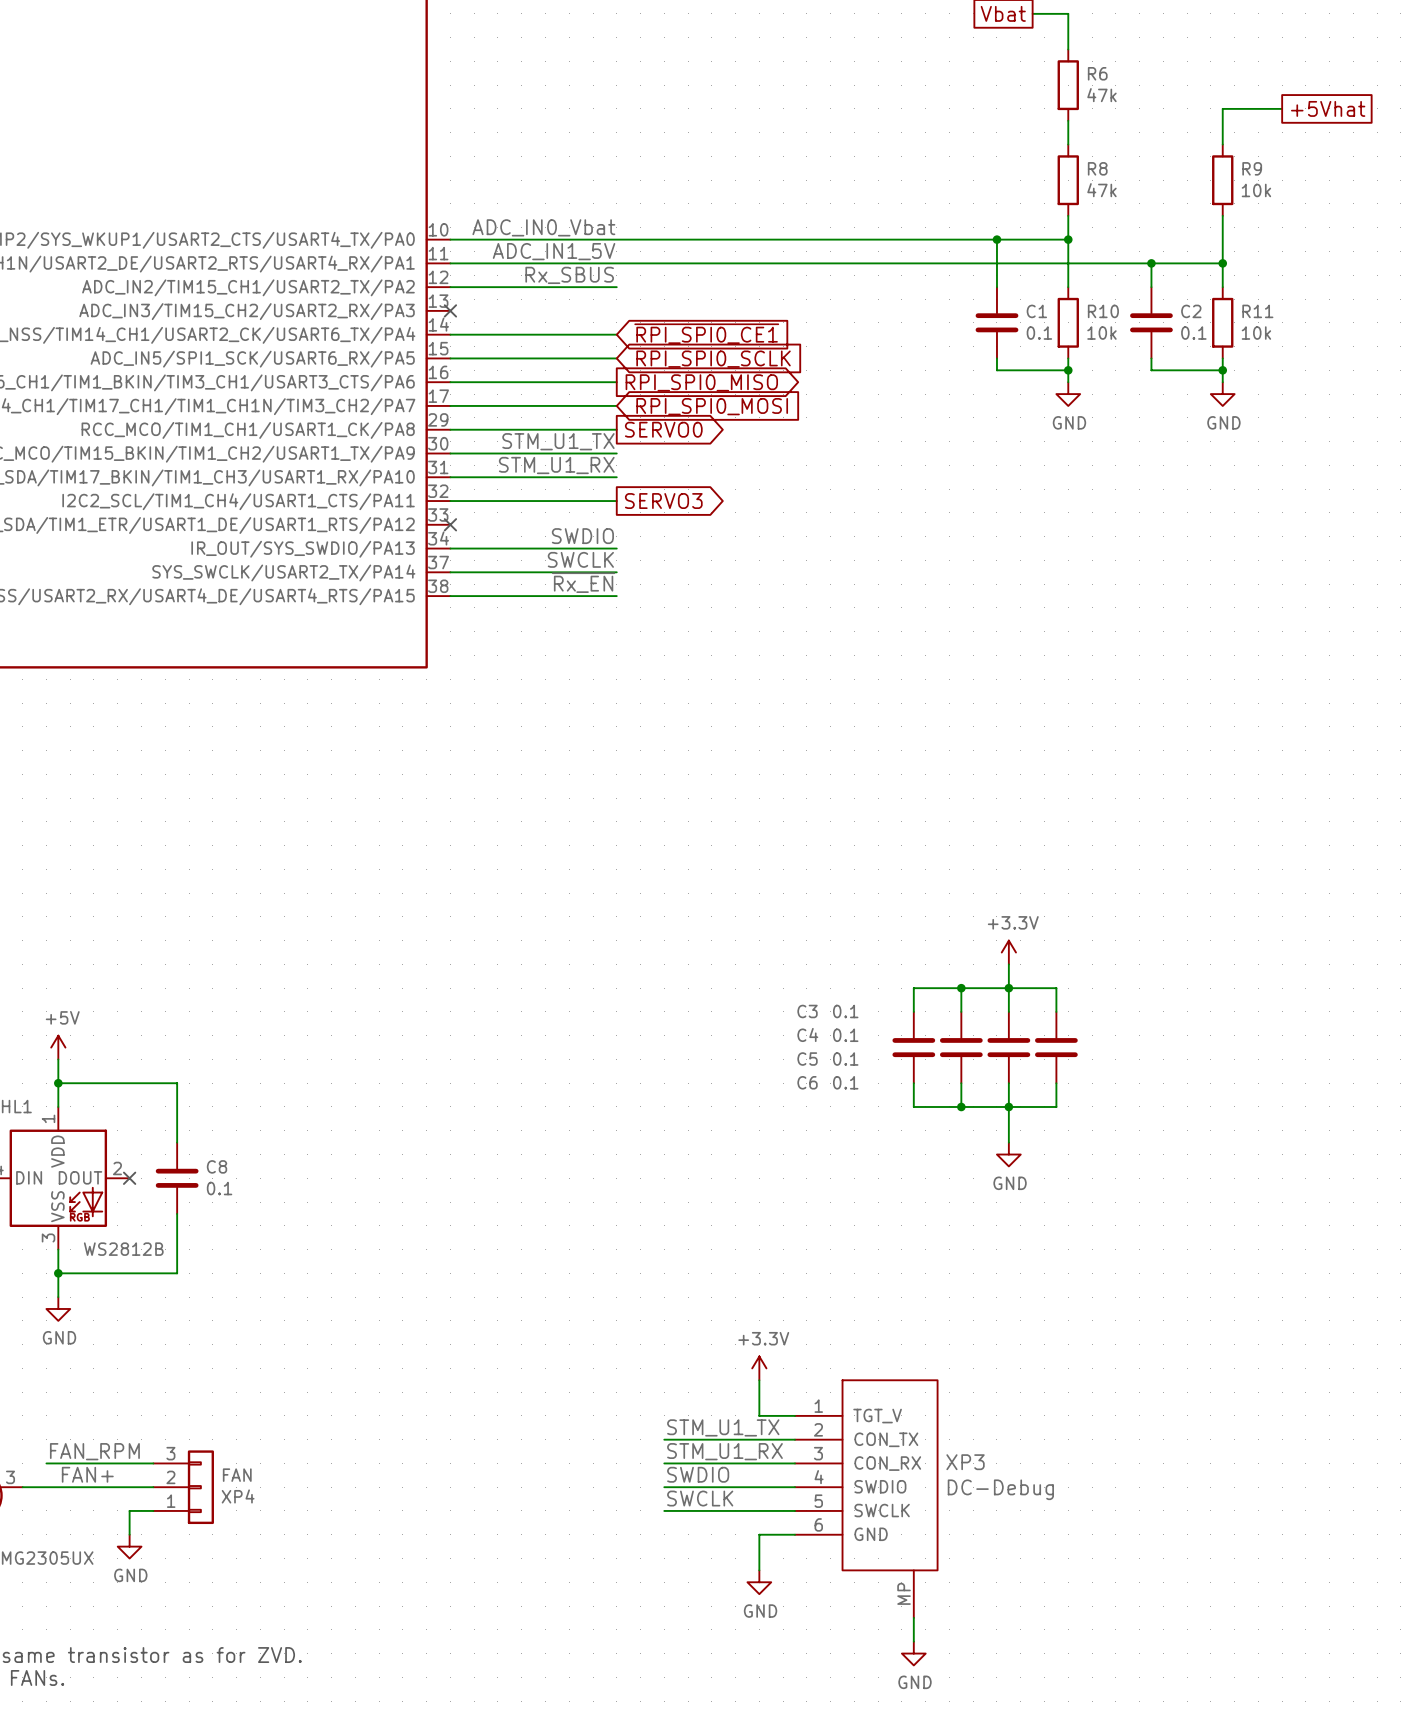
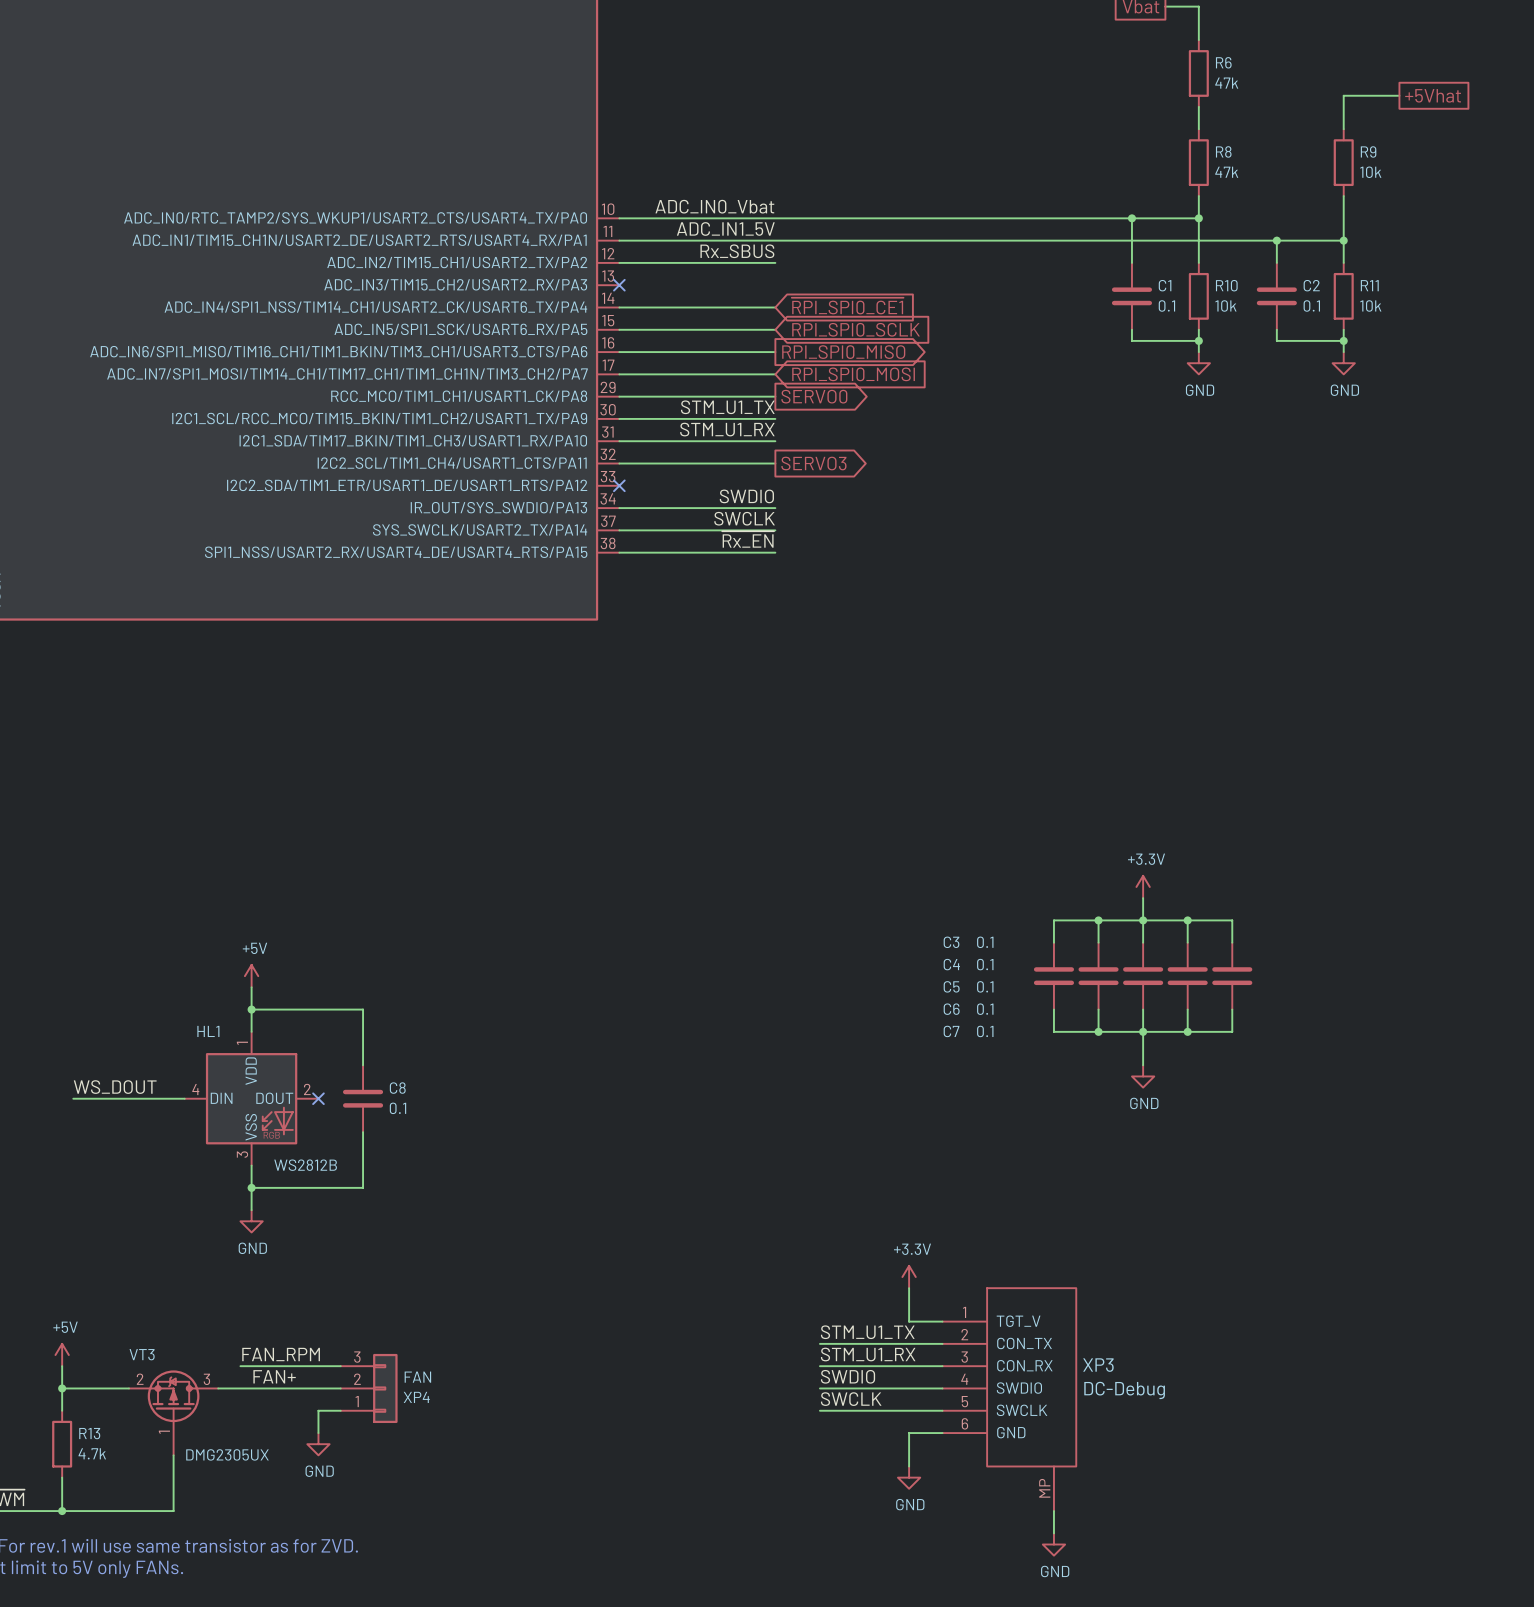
wire: none -> (1187, 920) (1232, 920) (1232, 942)
junction: none -> (1187, 920)
C7: none -> 0.1 (1232, 976)
wire: none -> (1232, 1009) (1232, 1031) (1187, 1031)
junction: none -> (1187, 1031)

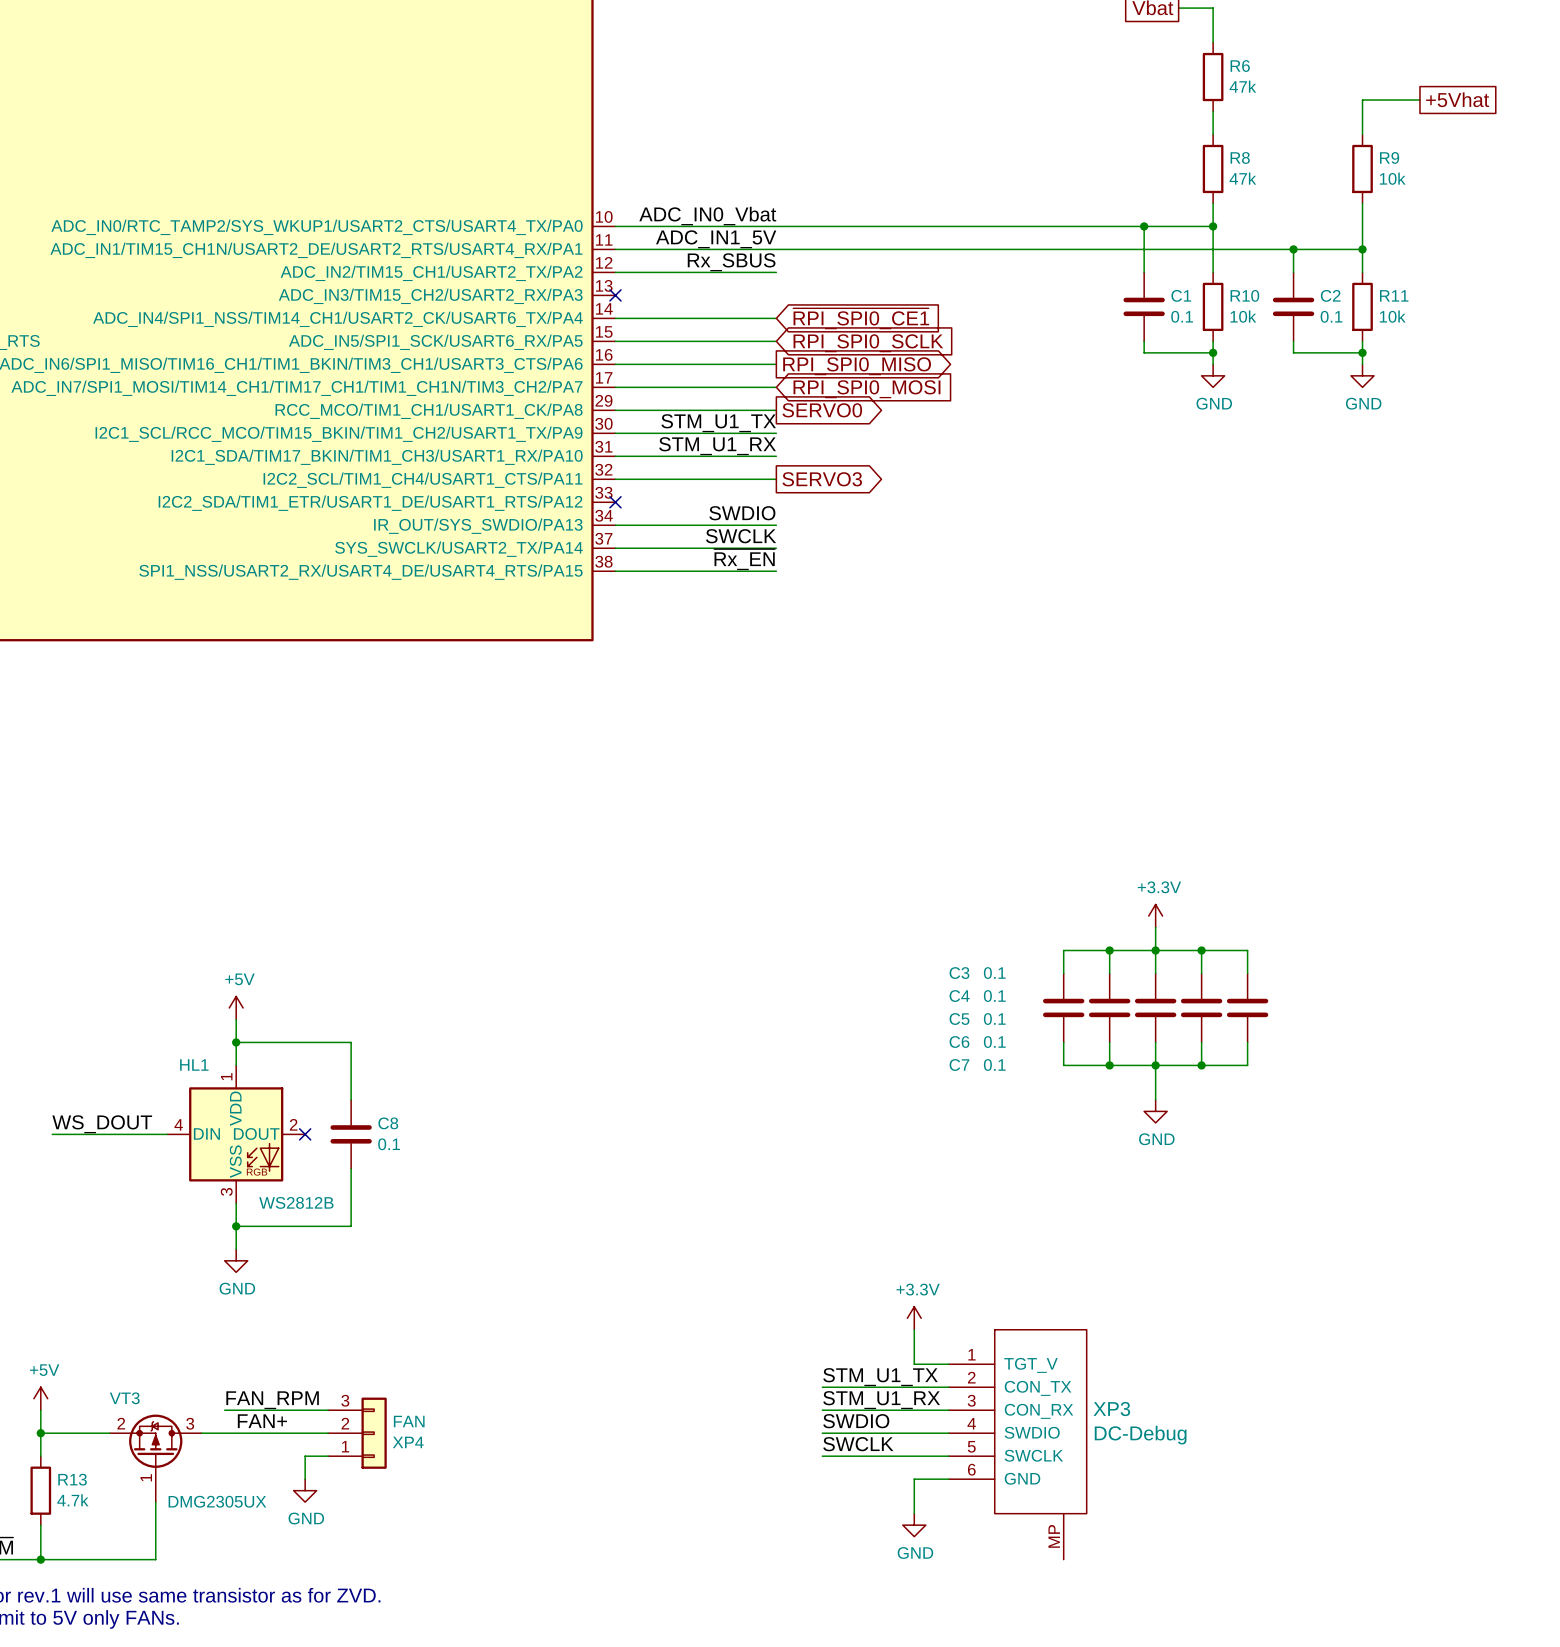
wire: (1053, 1511) (1053, 1533) -> none
power symbol: GND (1053, 1544) -> none

